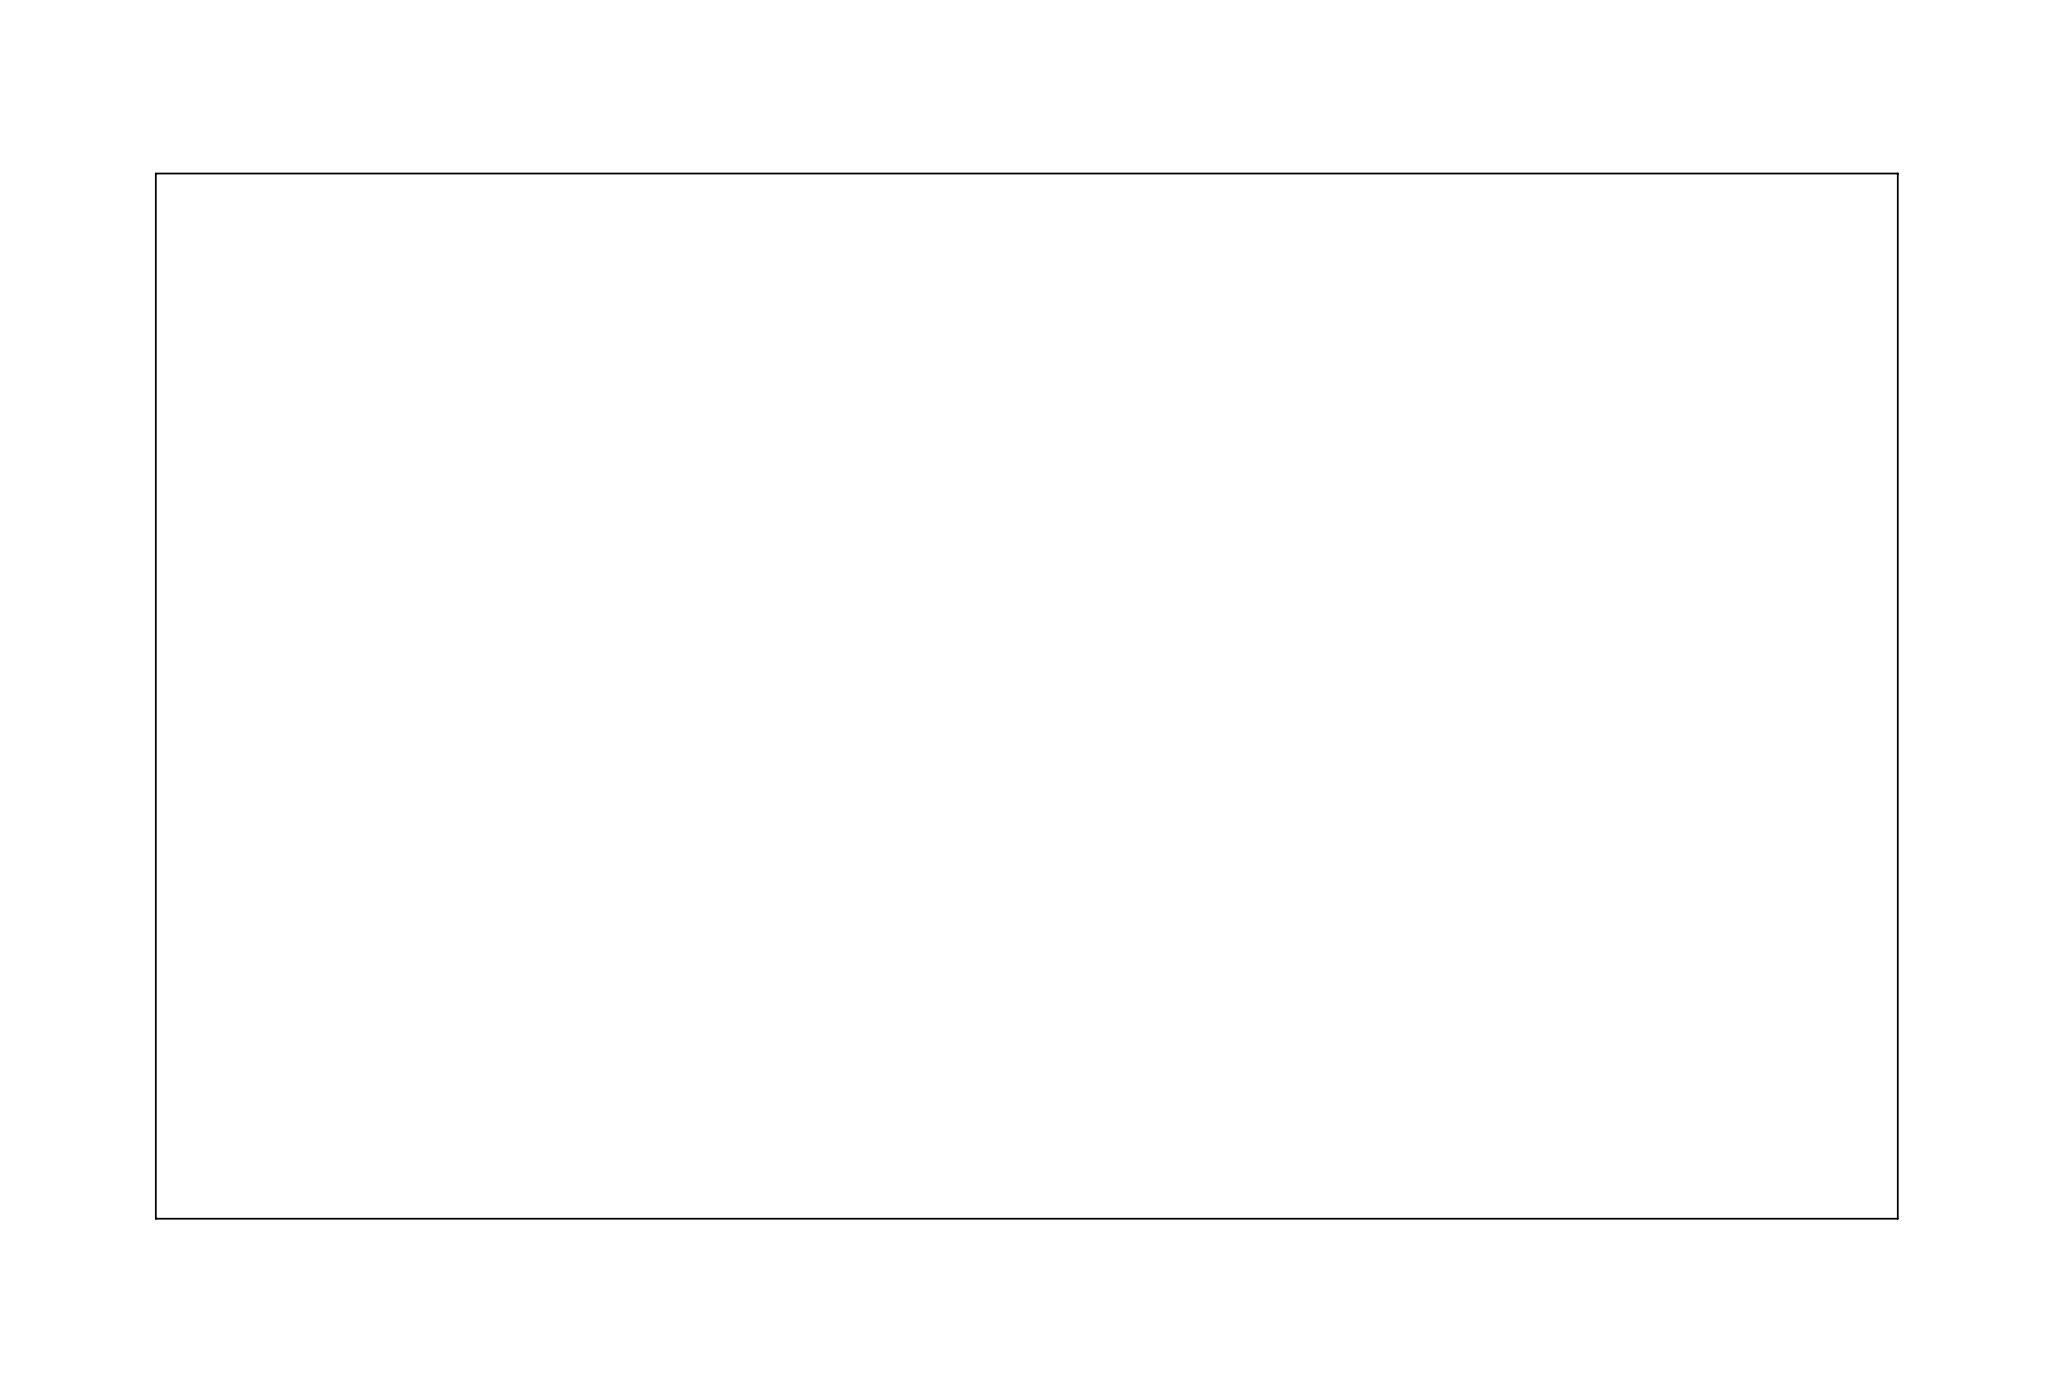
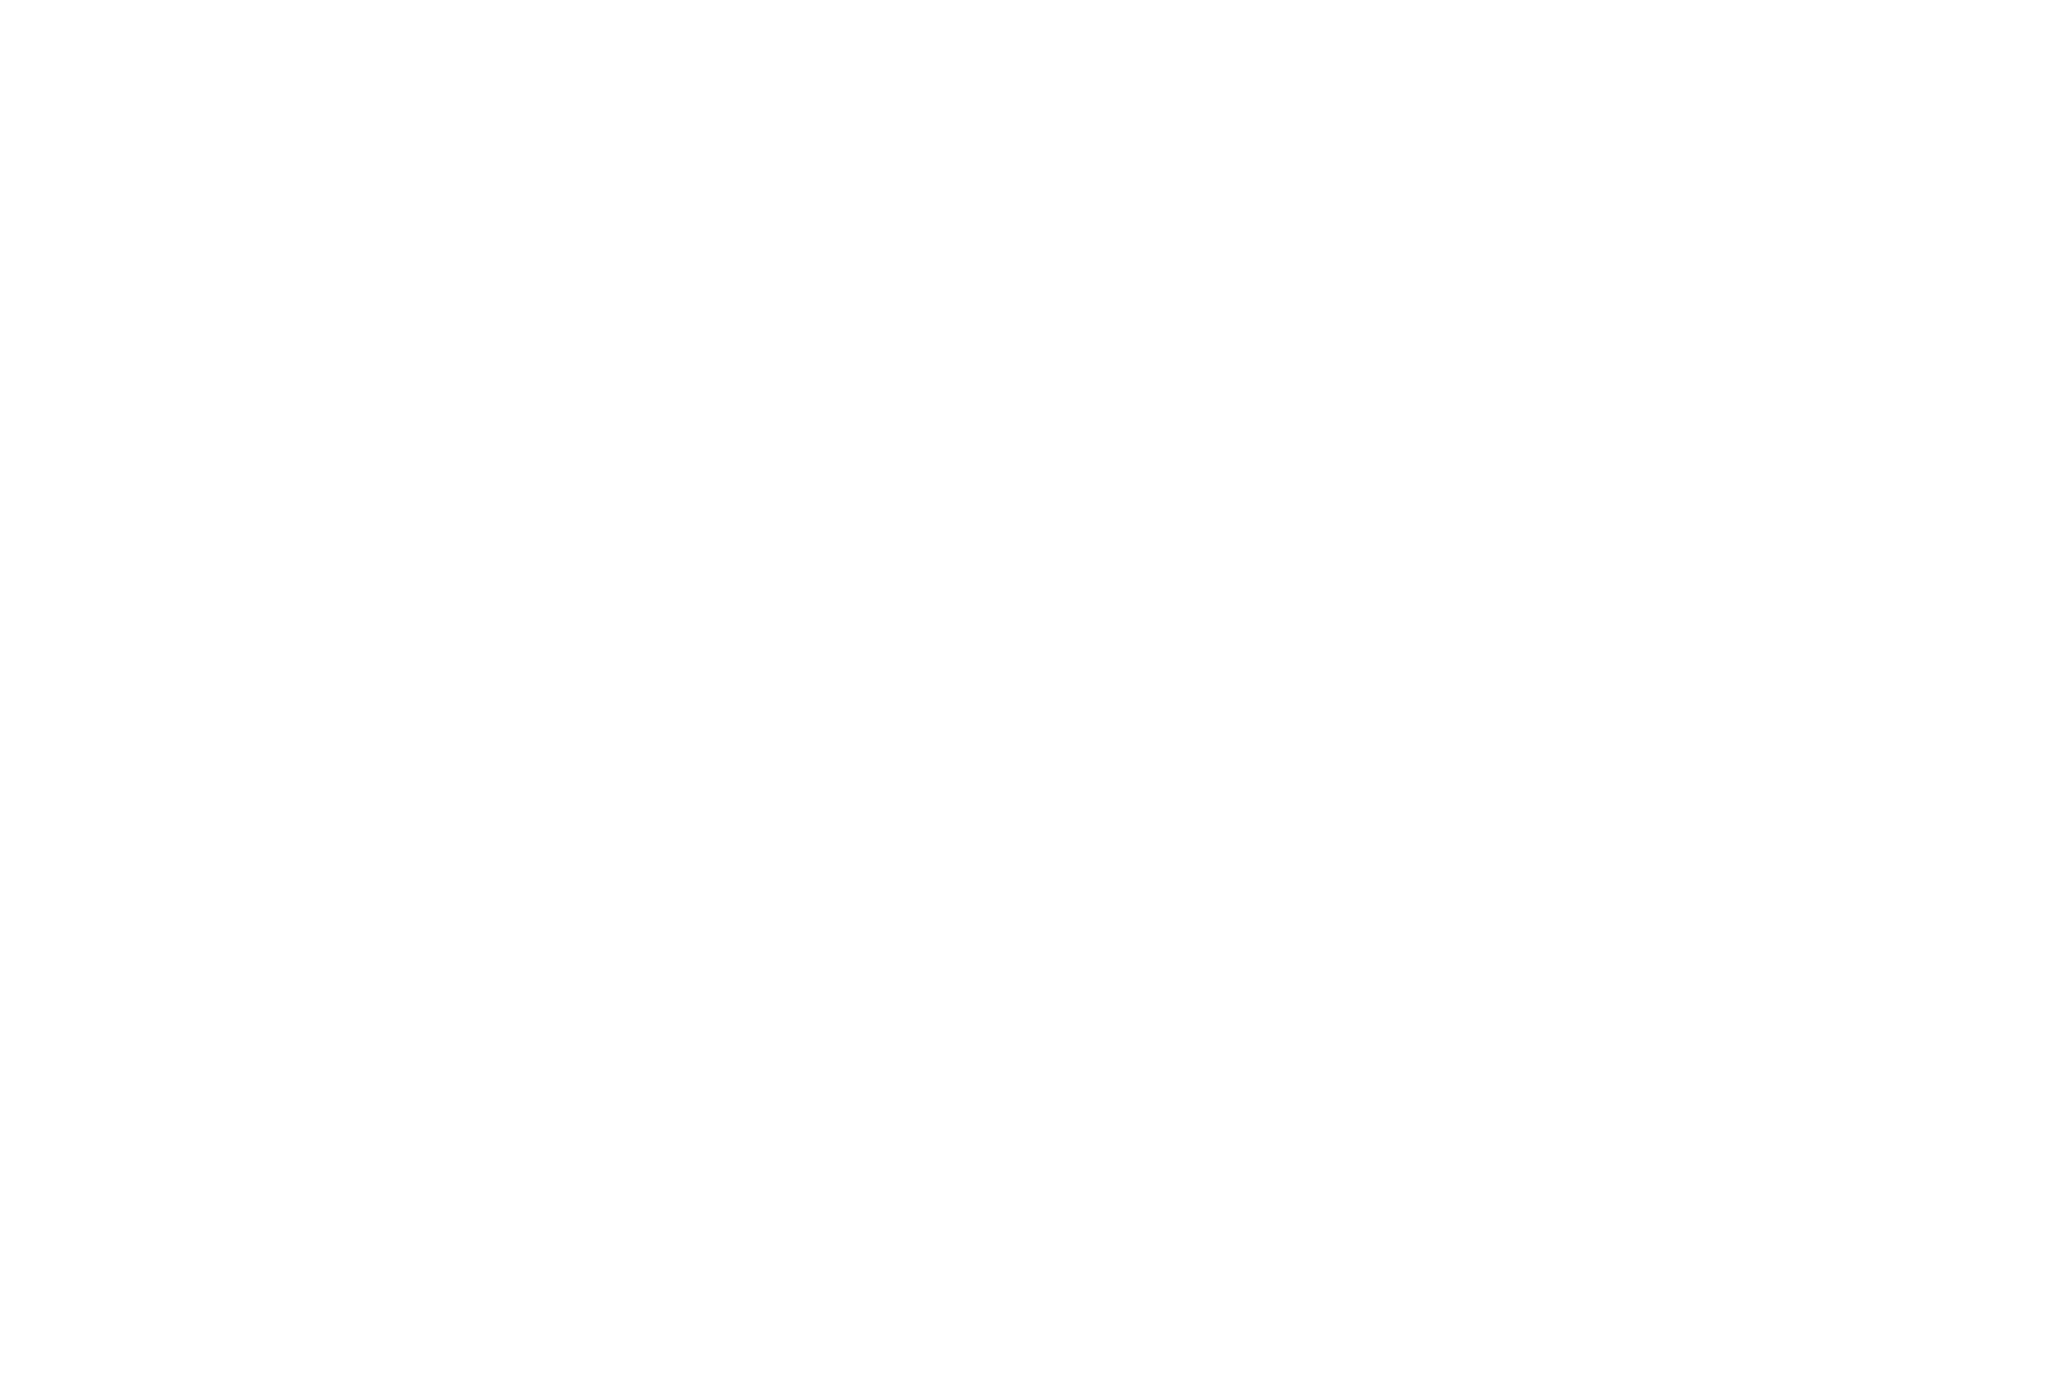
board edge: (155, 173) (1897, 173) (1897, 1218) (155, 1218) (155, 173) -> none

